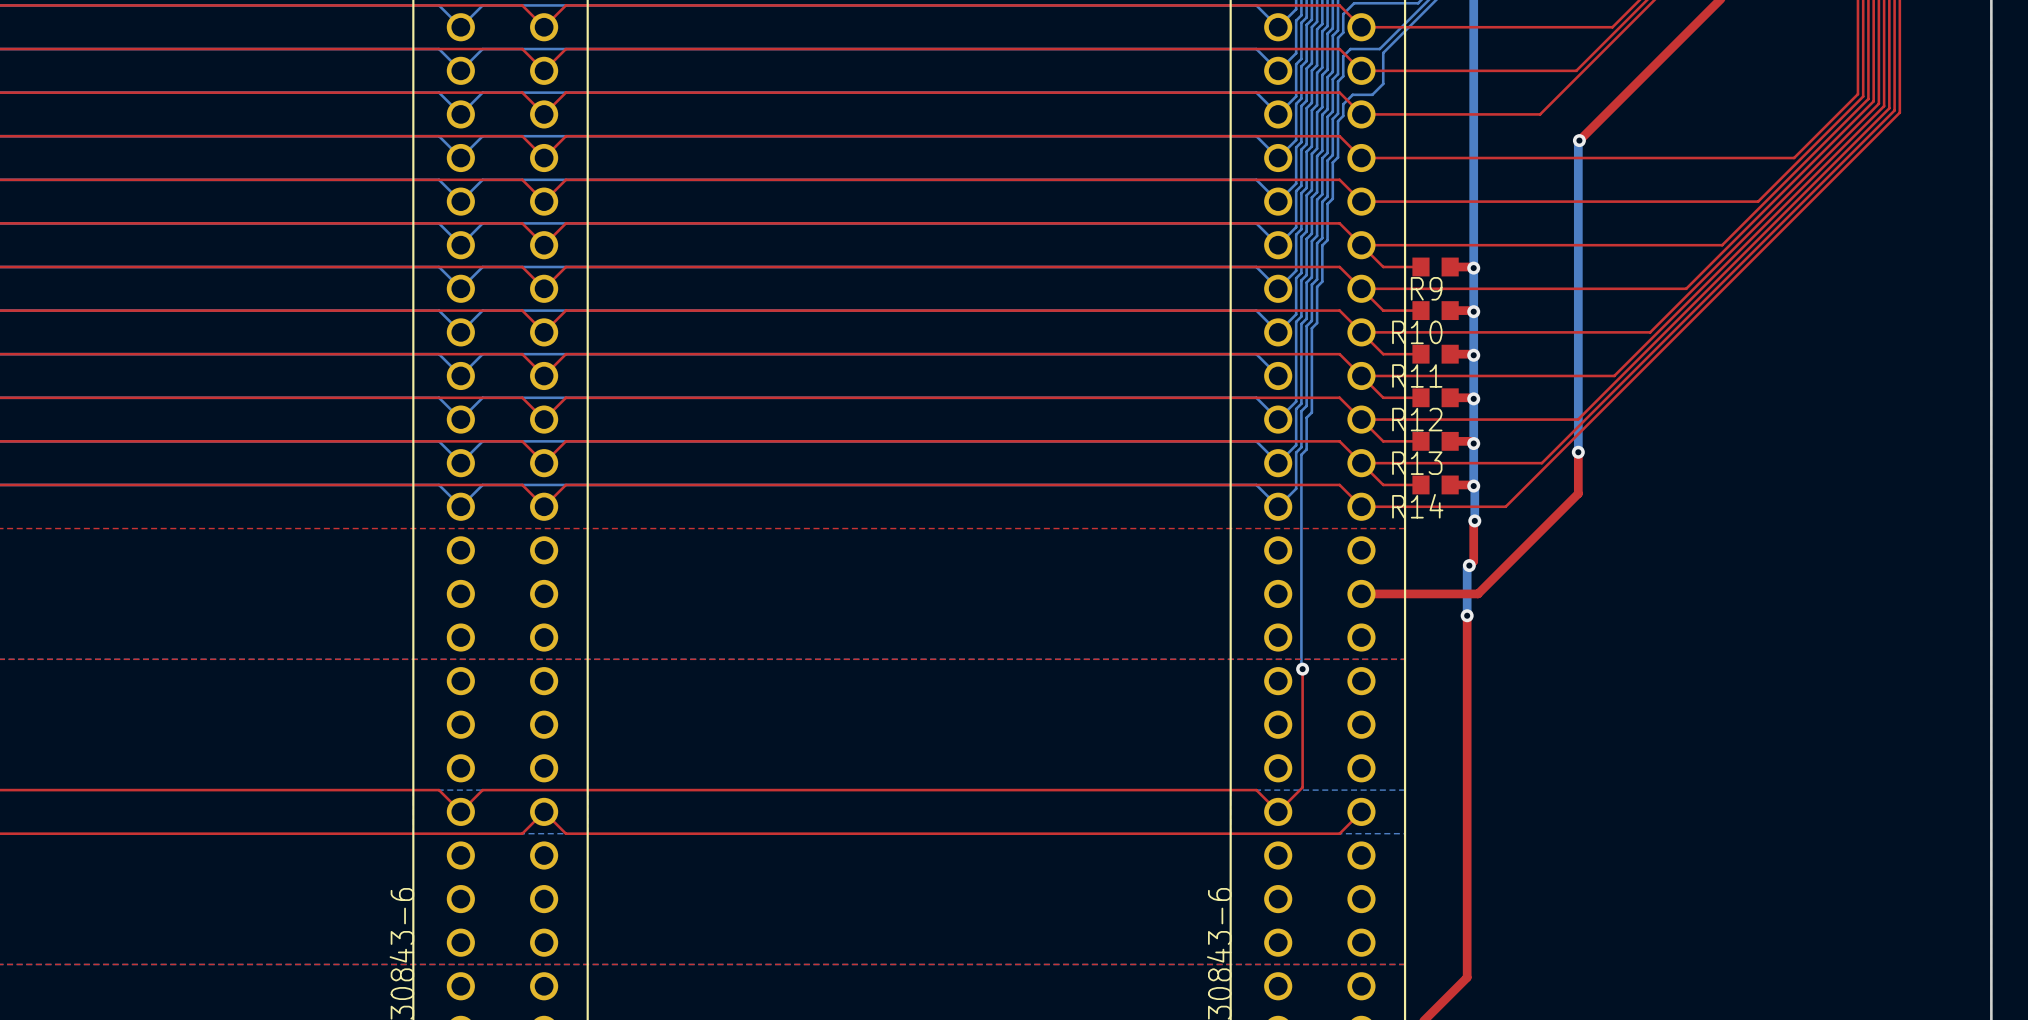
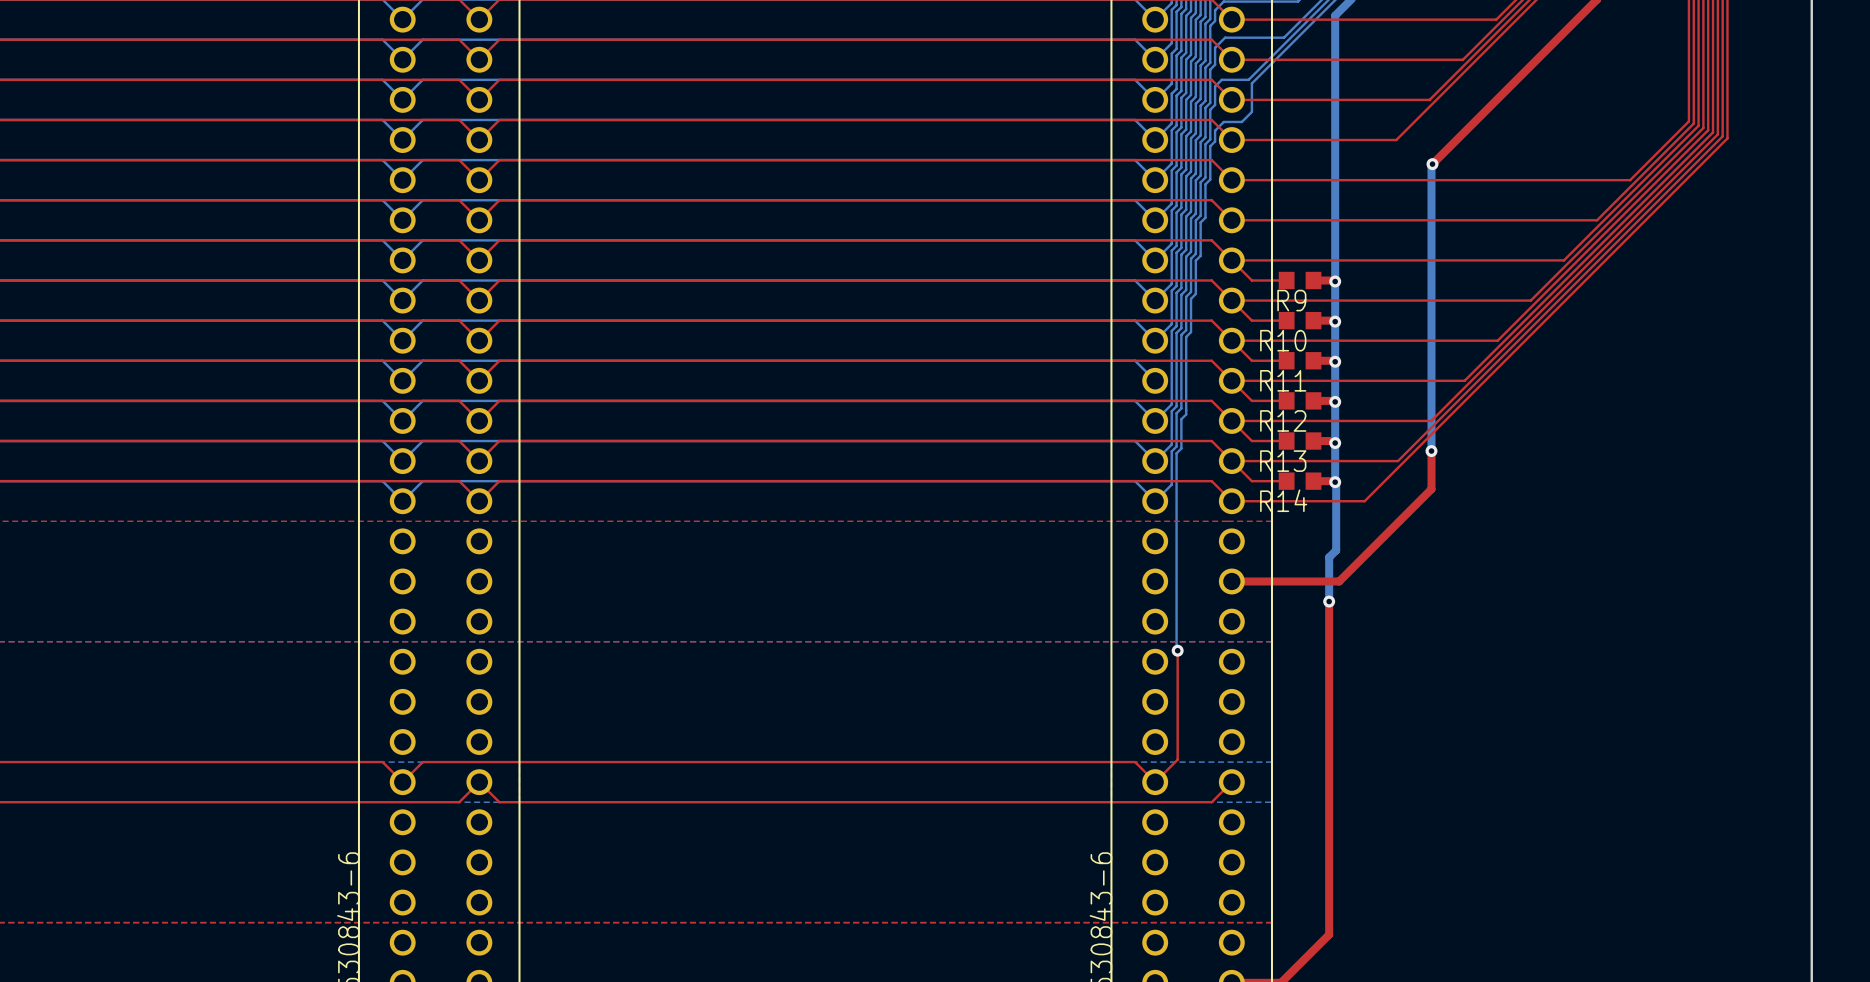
top track: (1474, 520) (1473, 561) (1469, 565) -> none
bottom track: none -> (1336, 514) (1336, 550) (1331, 555)
via: (1474, 520) -> none
via: (1469, 565) -> none

